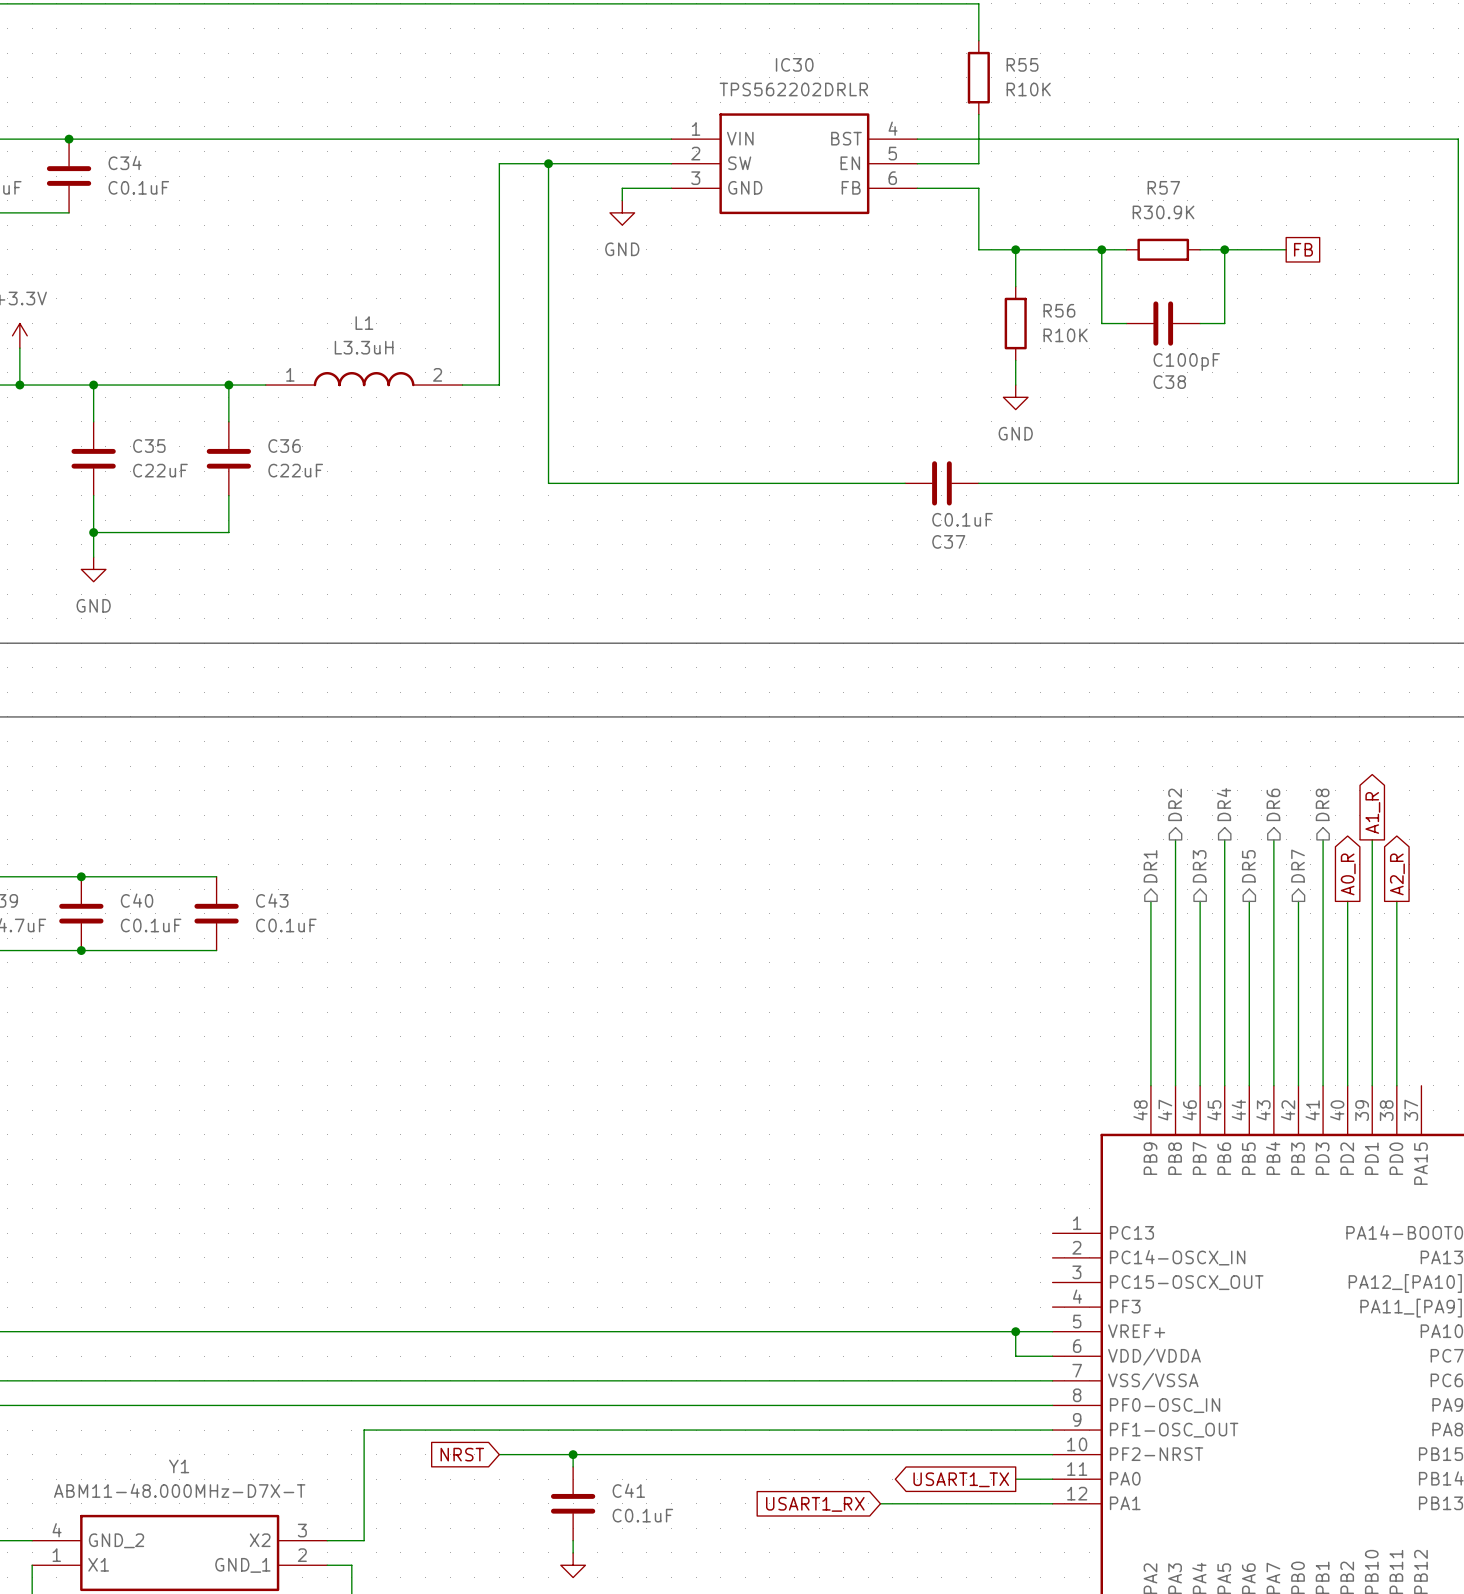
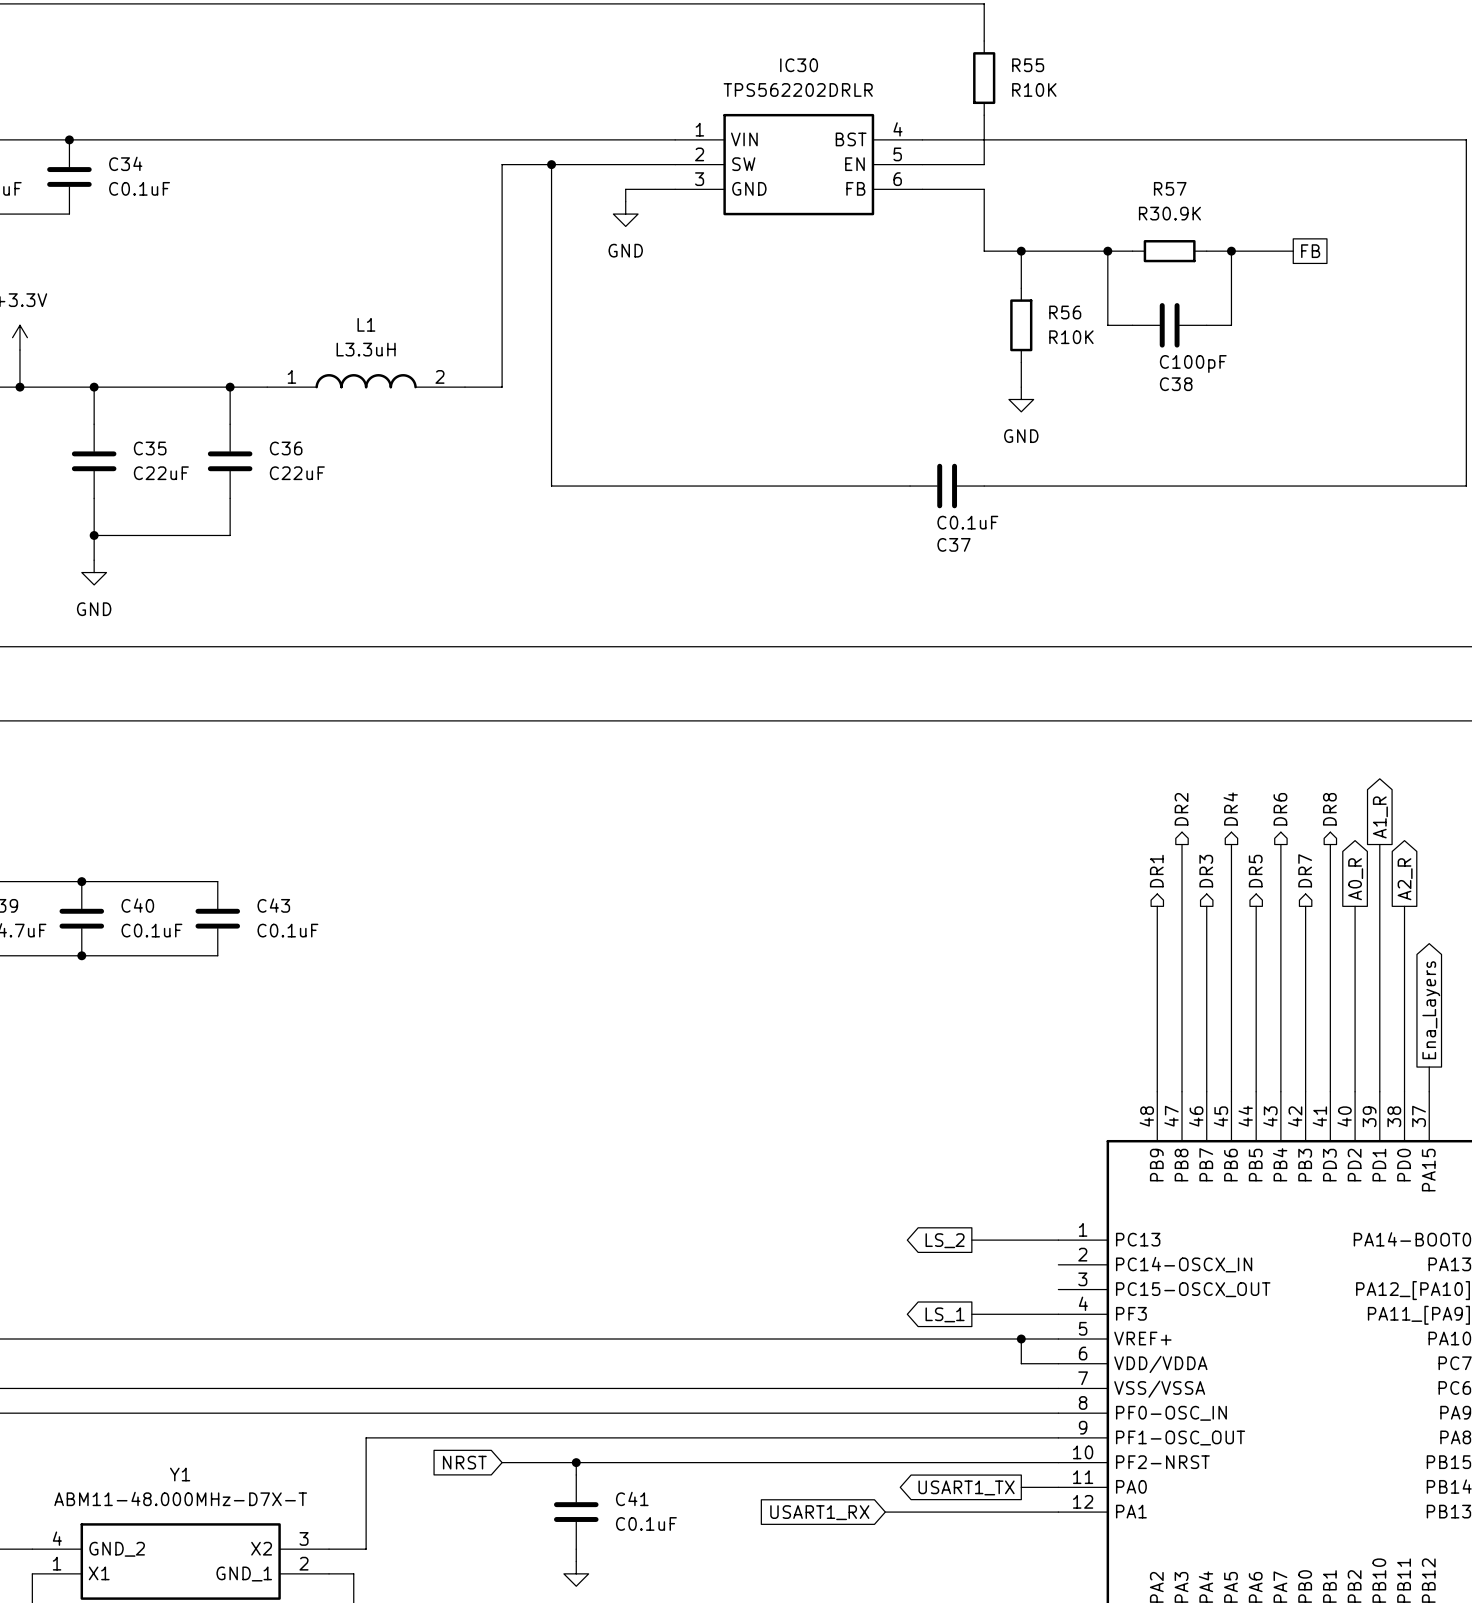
global label: none -> Ena_Layers (1431, 1010)
wire: none -> (1429, 1067) (1429, 1091)
global label: none -> LS_2 (945, 1240)
wire: none -> (971, 1240) (1058, 1240)
global label: none -> LS_1 (945, 1314)
wire: none -> (971, 1314) (1058, 1314)

